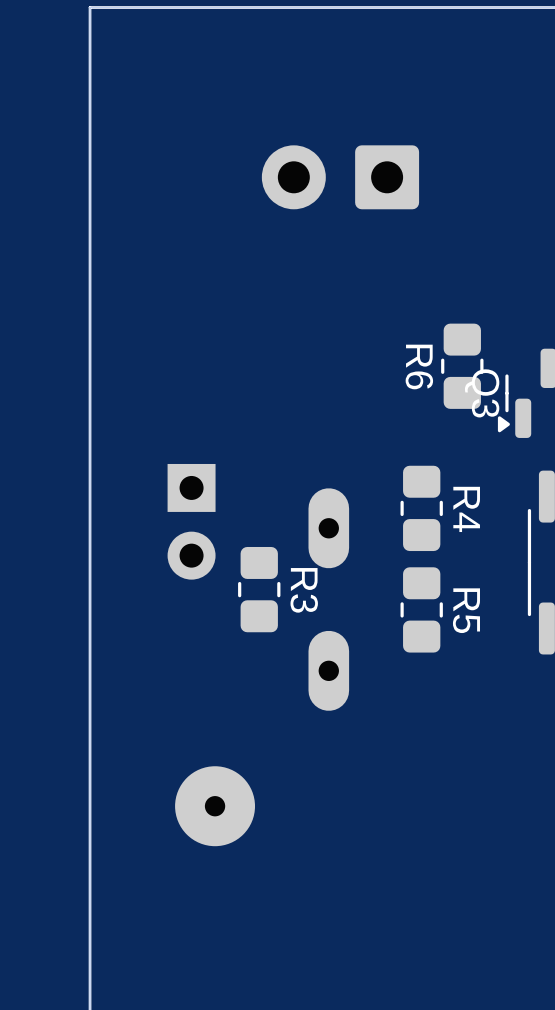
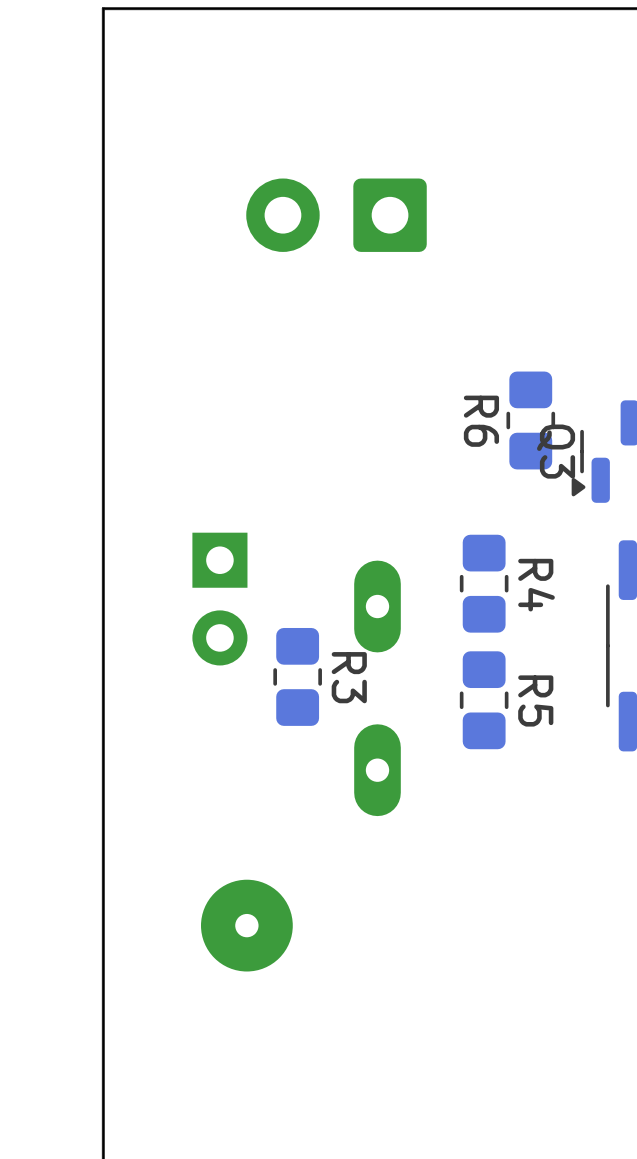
part position: (340, 177) -> (336, 215)

